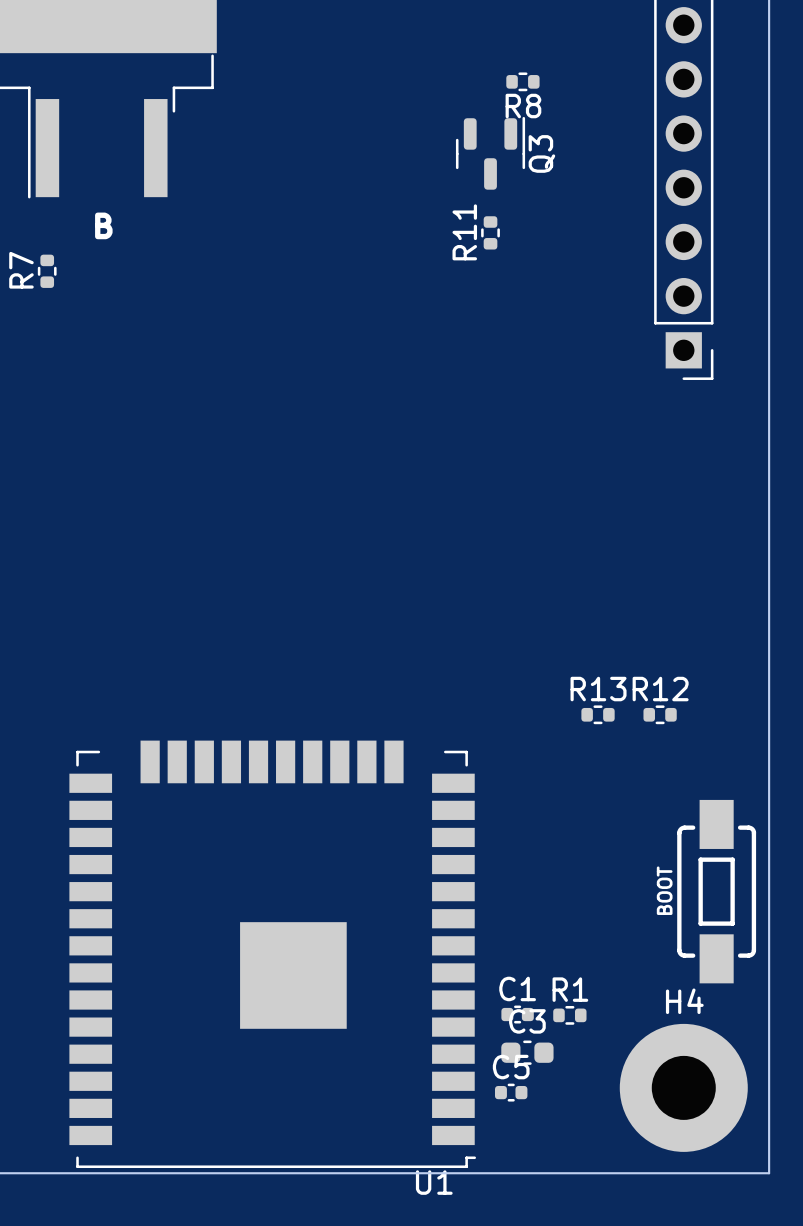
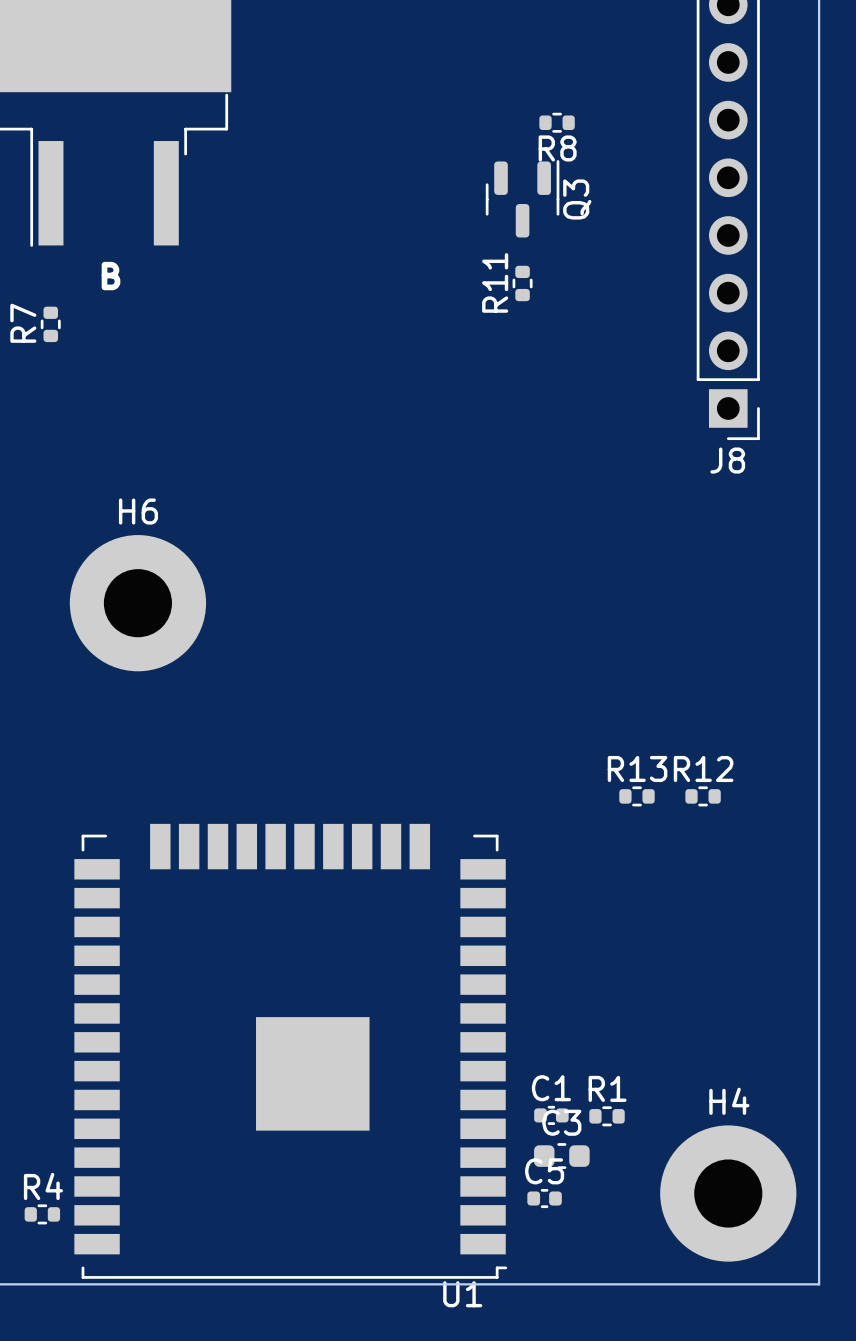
J8 name: none -> J8 (727, 460)
H6: none -> (137, 603)
BOOT: (716, 891) -> none
R4: none -> (42, 1214)

